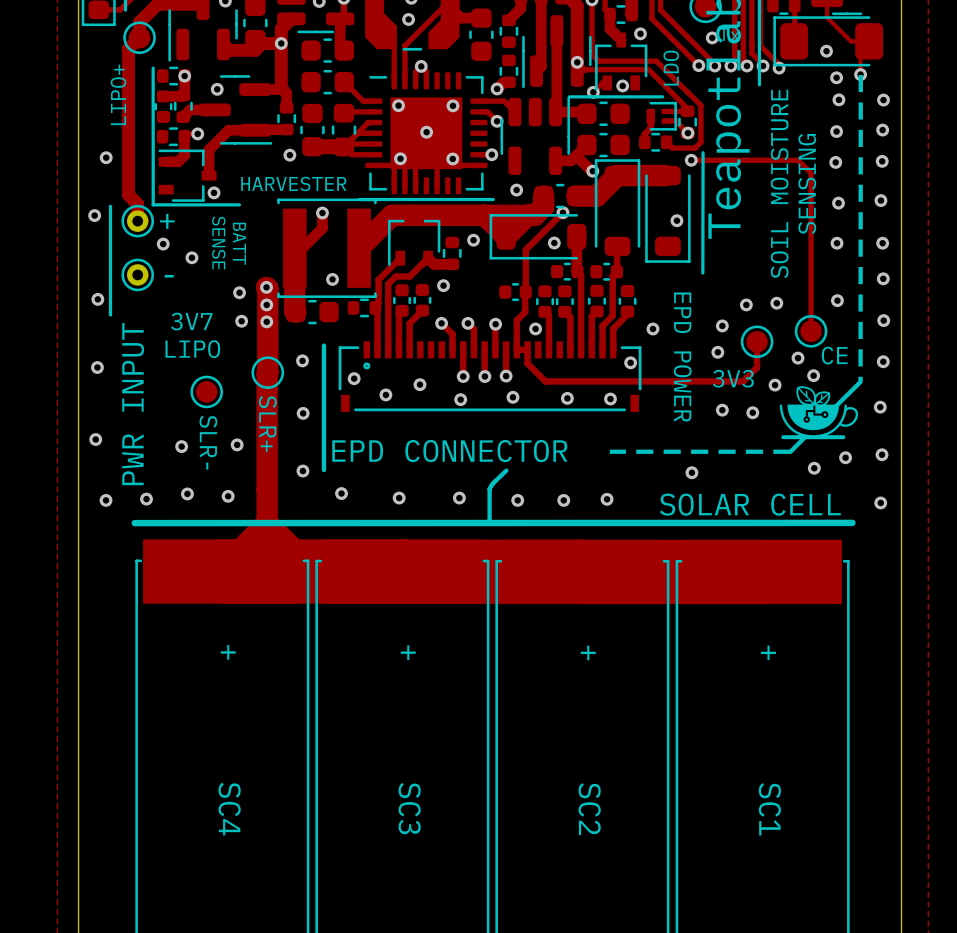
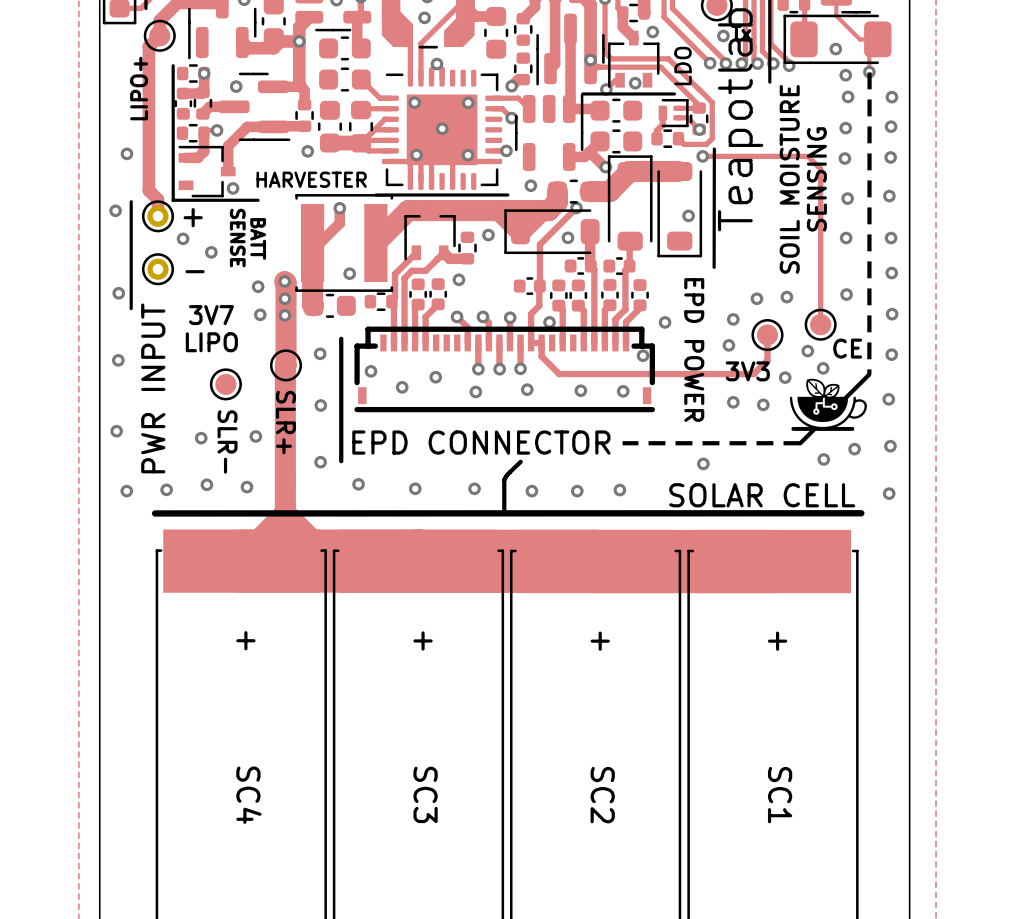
part footprint: [338, 341, 642, 412] -> [354, 326, 655, 413]

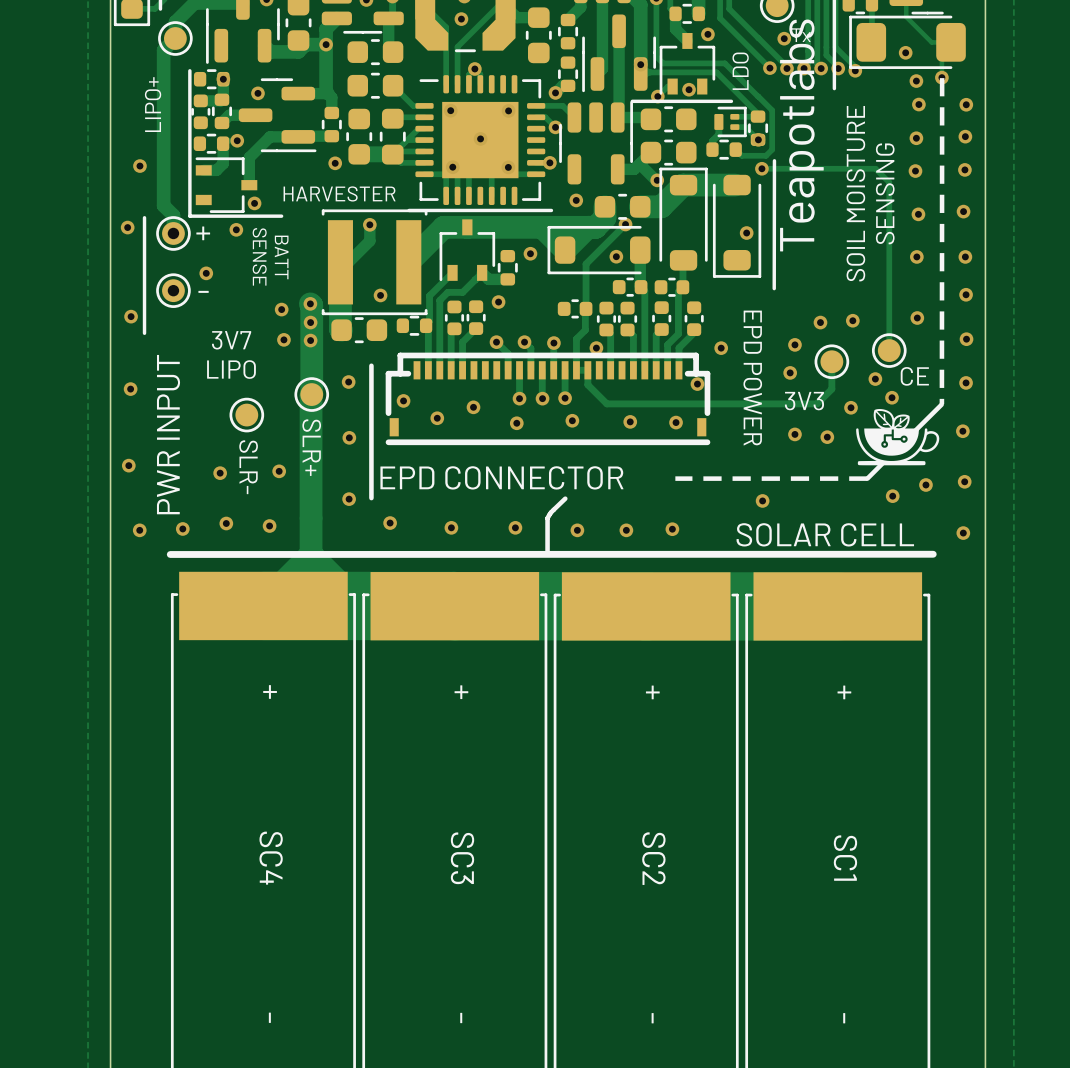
via: none -> (236, 229)
via: (183, 238) -> none
via: (211, 252) -> none
via: none -> (206, 273)

